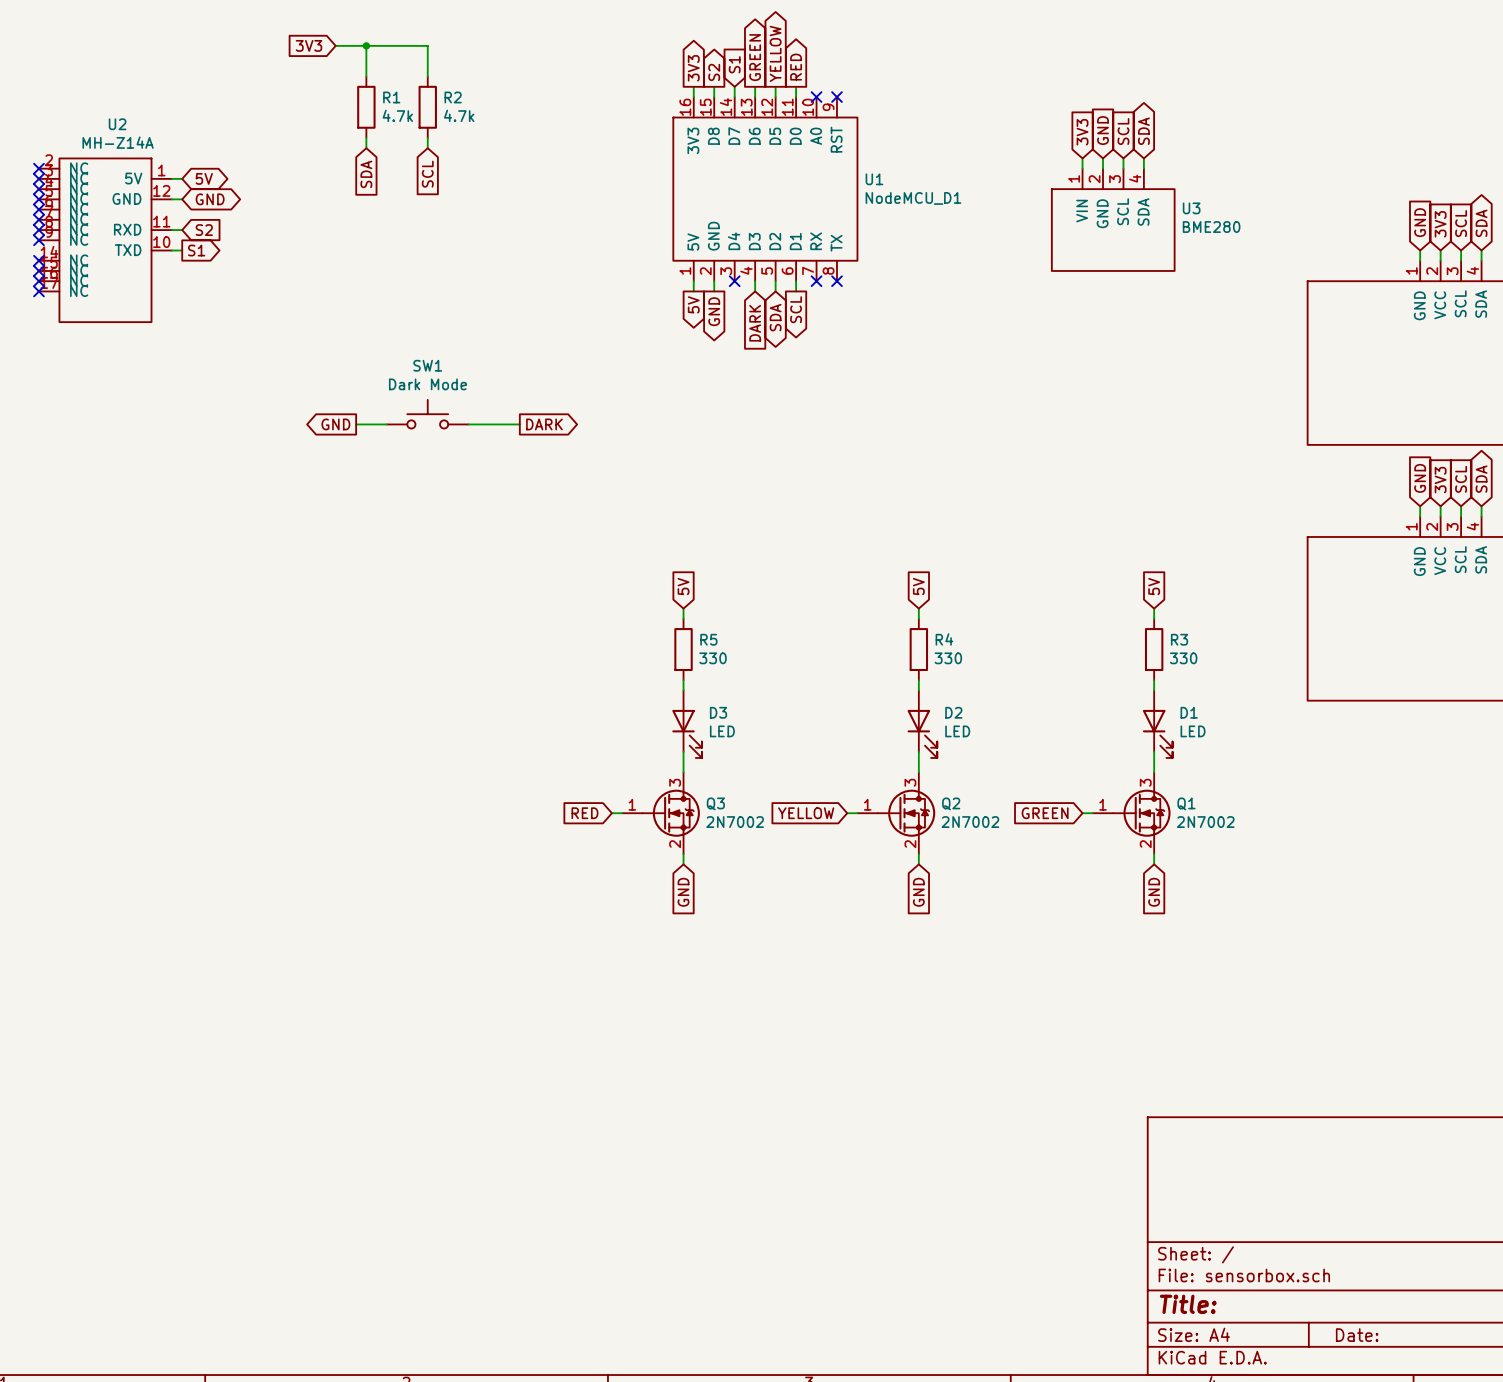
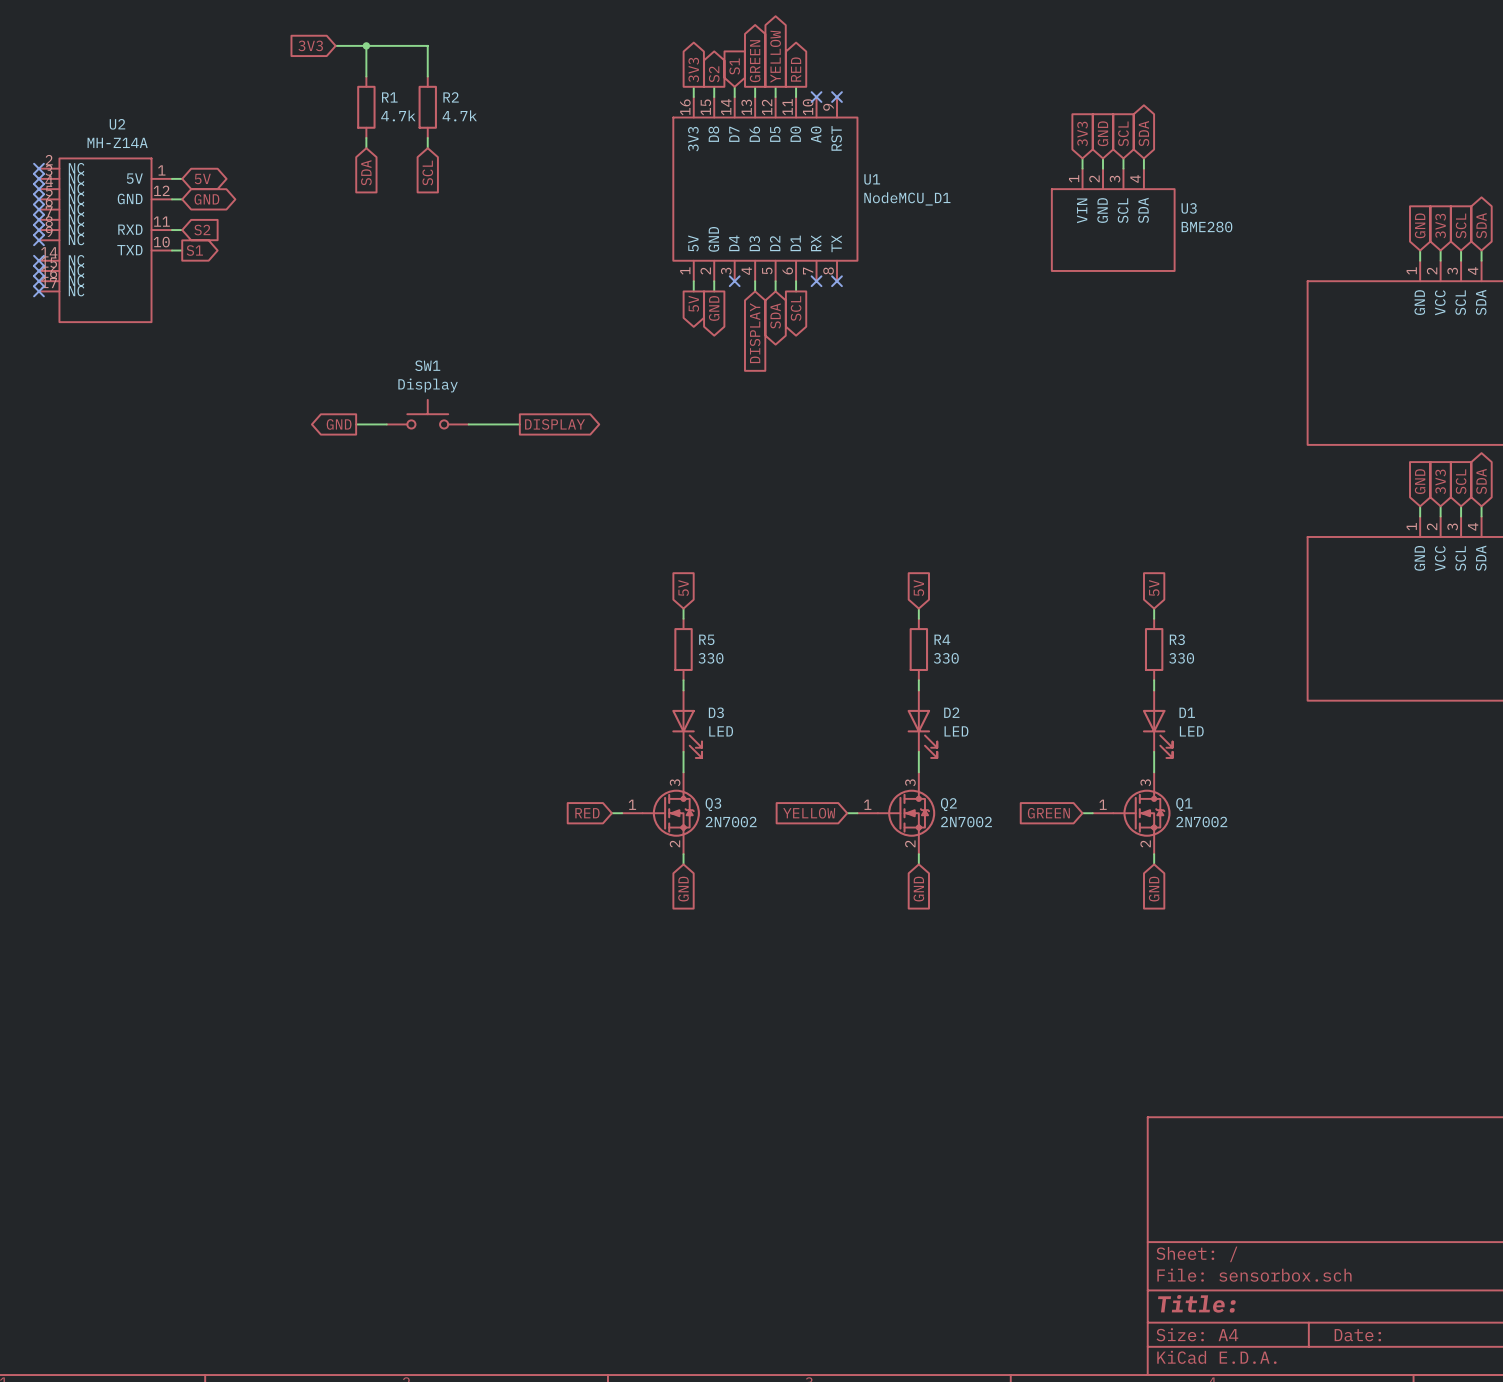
global label: DARK (755, 323) -> DISPLAY (755, 333)
SW1 value: Dark Mode (428, 384) -> Display (428, 385)
global label: DARK (544, 424) -> DISPLAY (555, 424)

